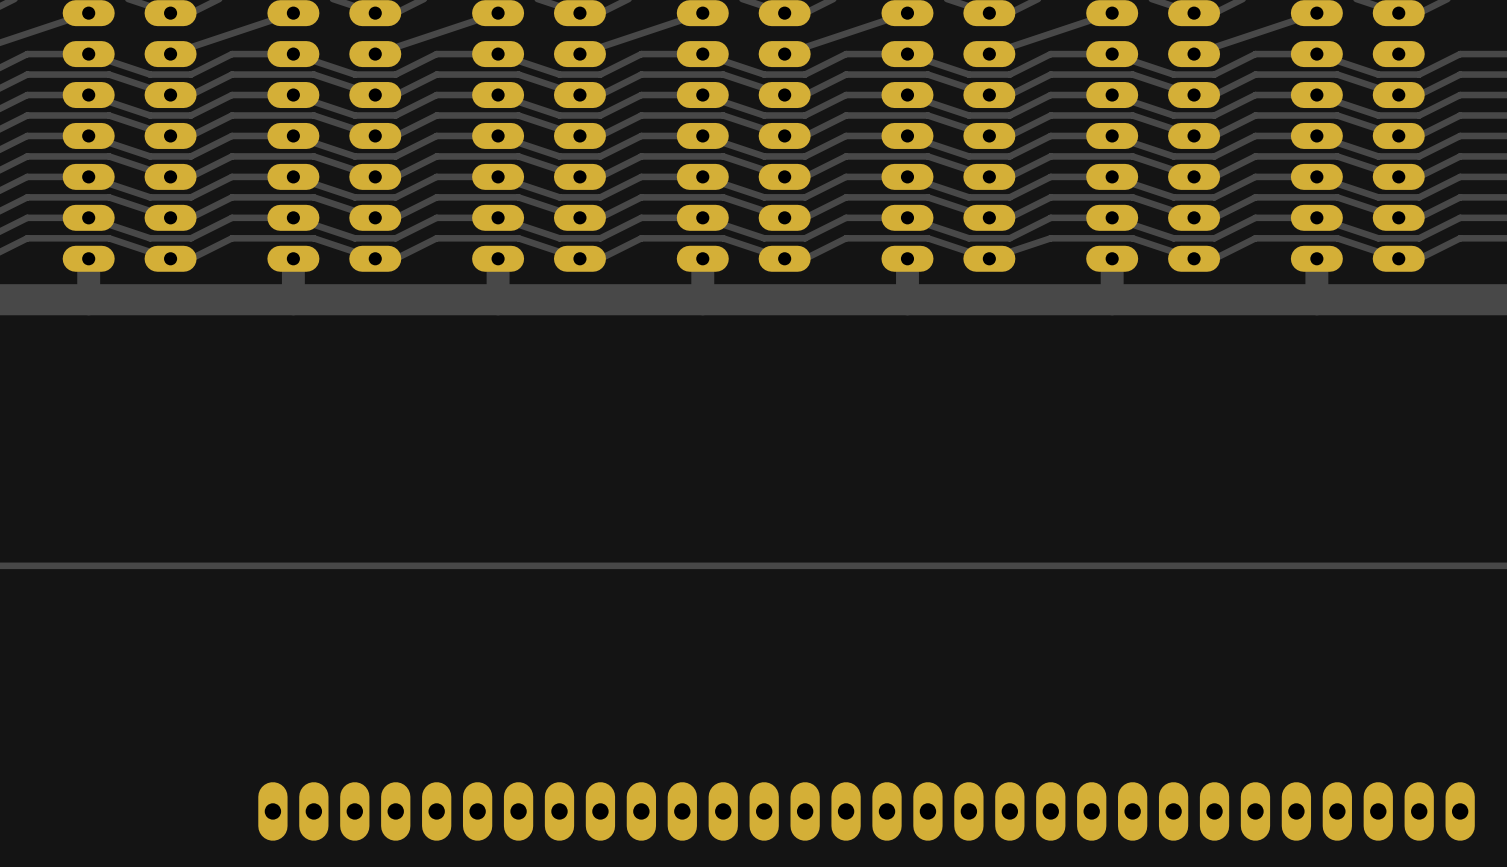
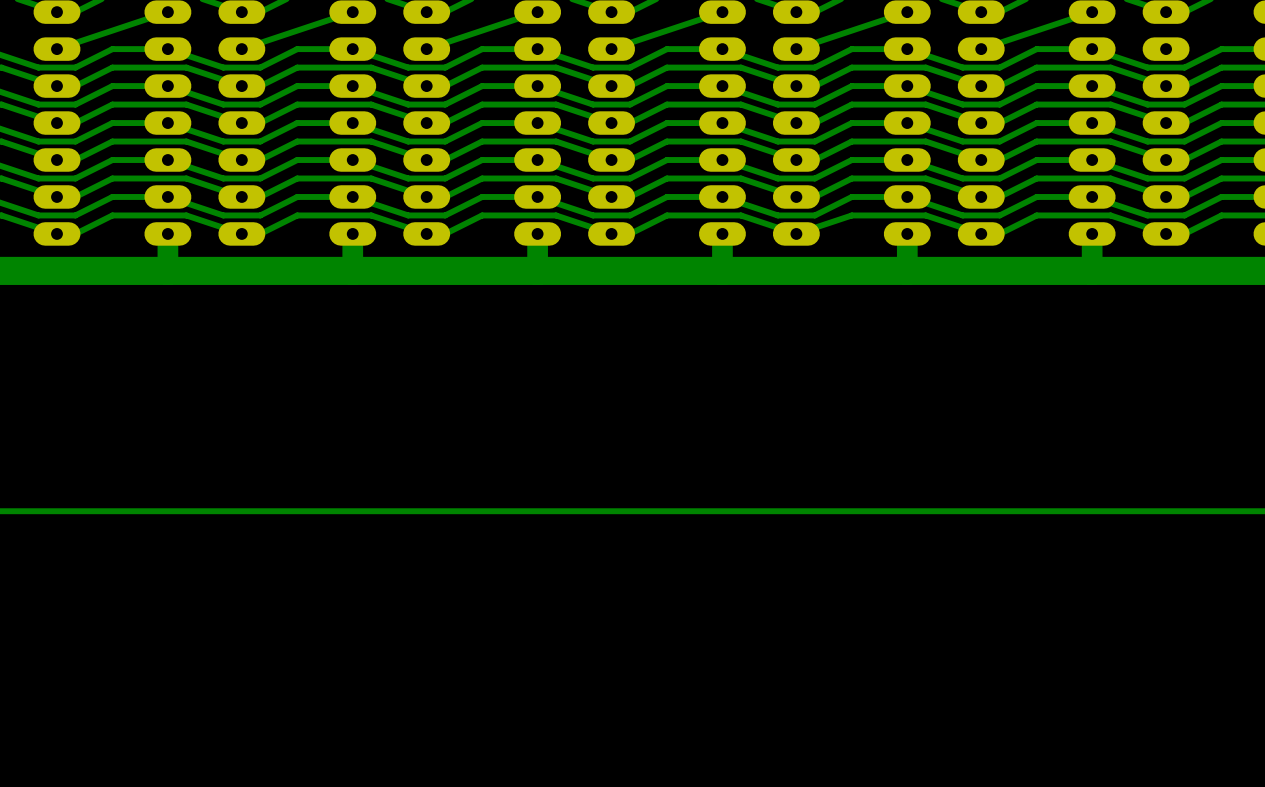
part: (866, 811) -> none

